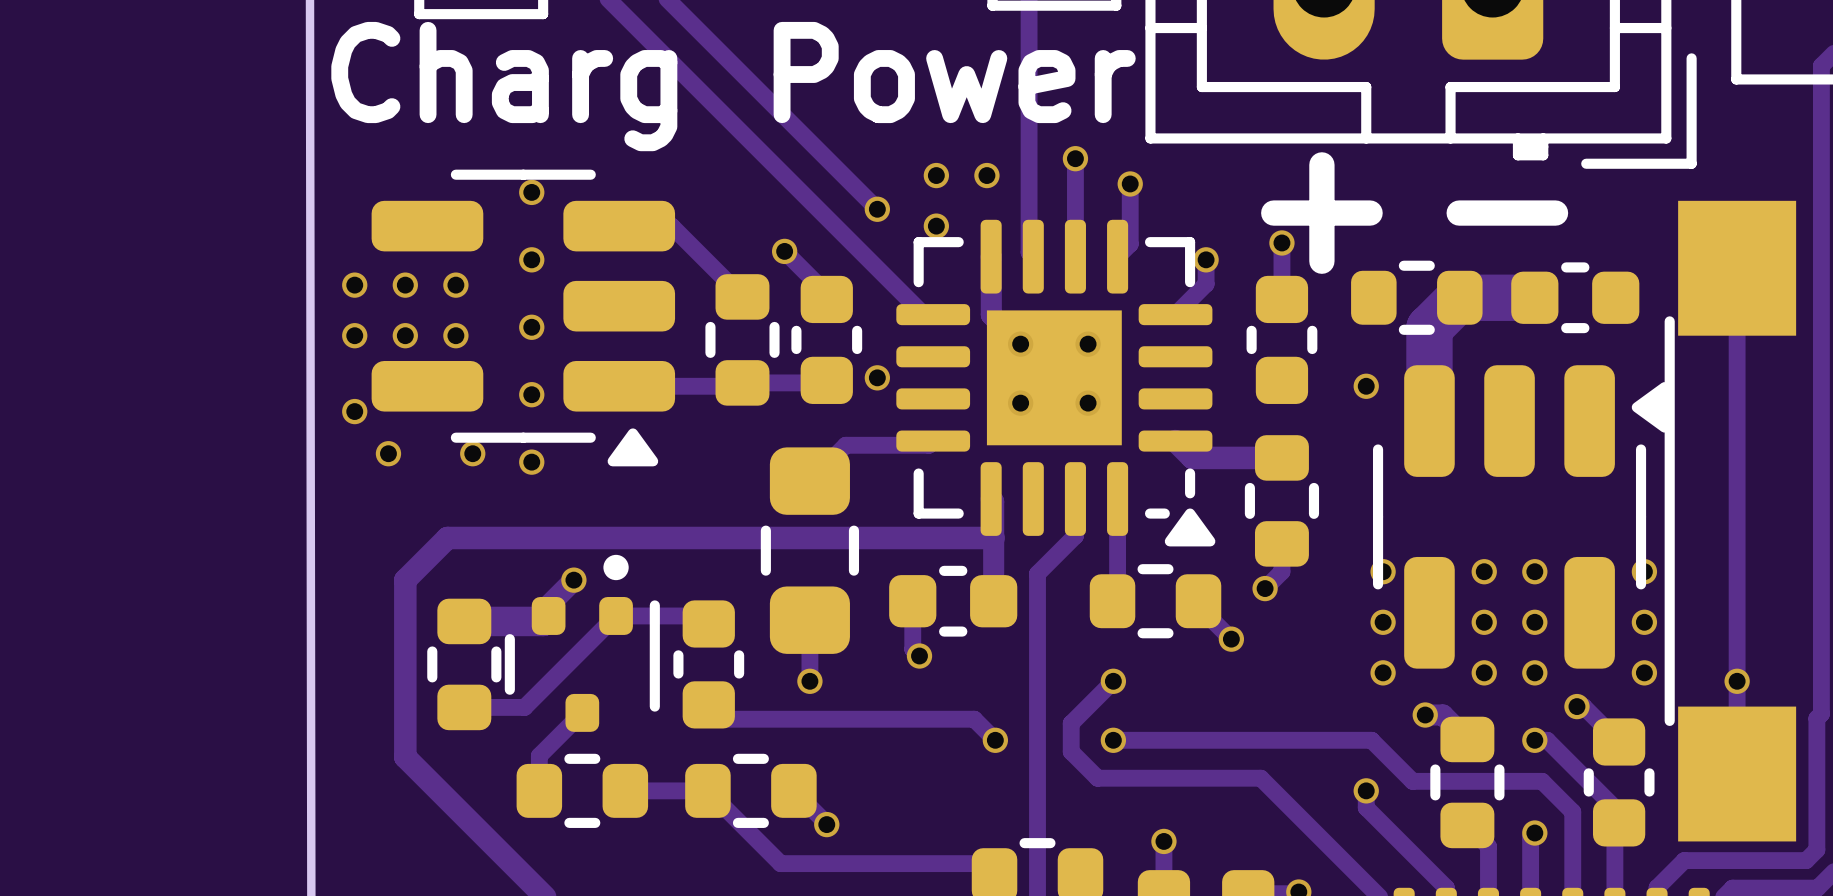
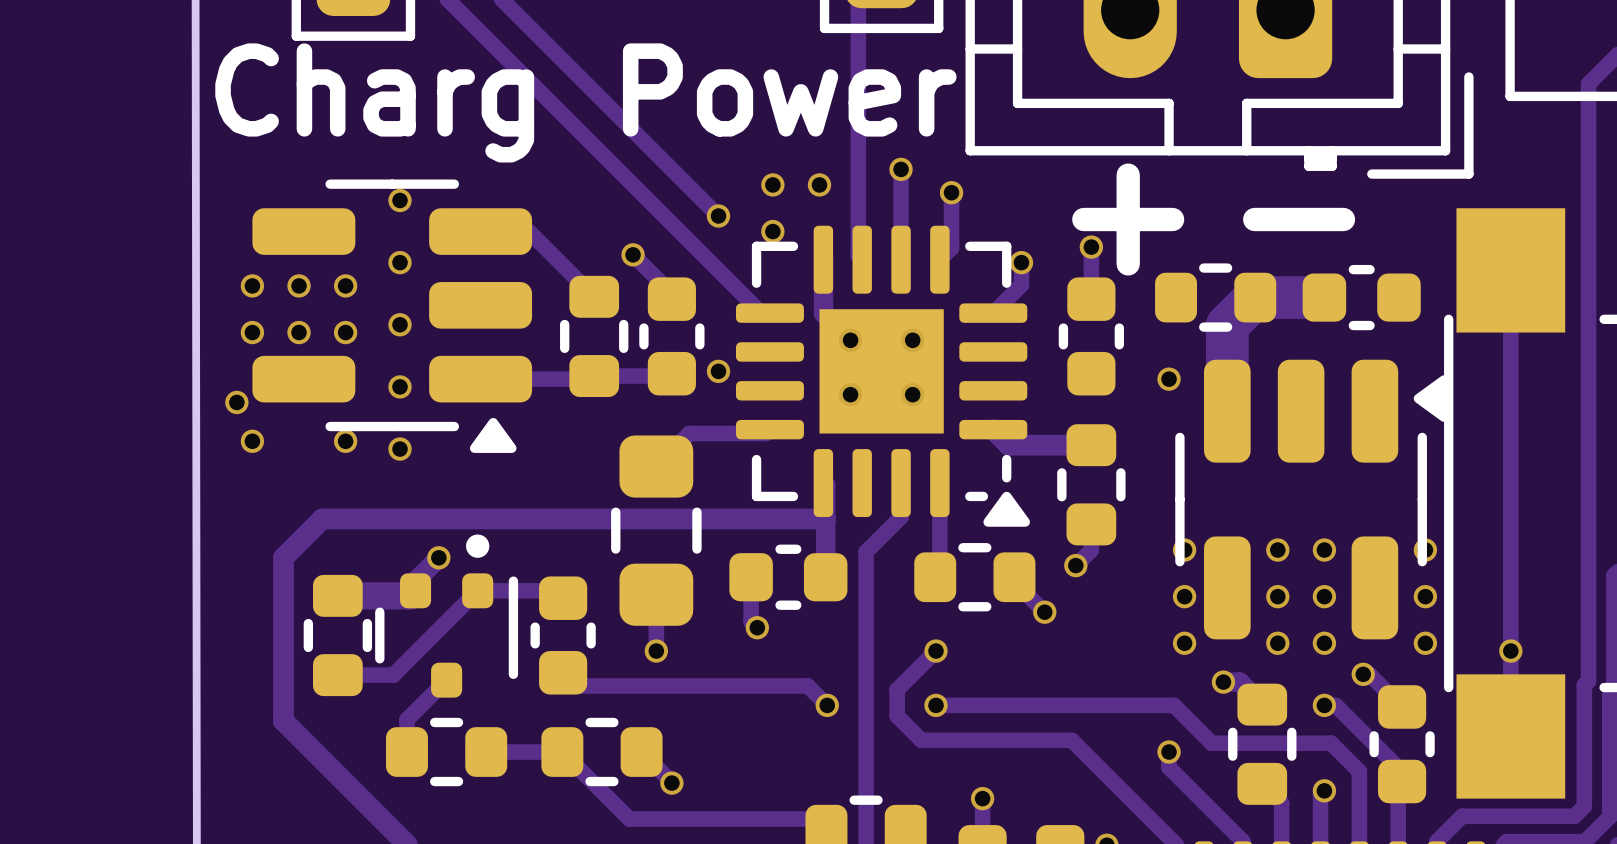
via position: (354, 285) -> (252, 285)
via position: (405, 285) -> (299, 285)
via position: (455, 285) -> (345, 285)
via position: (354, 335) -> (252, 332)
via position: (405, 335) -> (299, 332)
via position: (455, 335) -> (345, 332)
via position: (388, 453) -> (252, 441)

